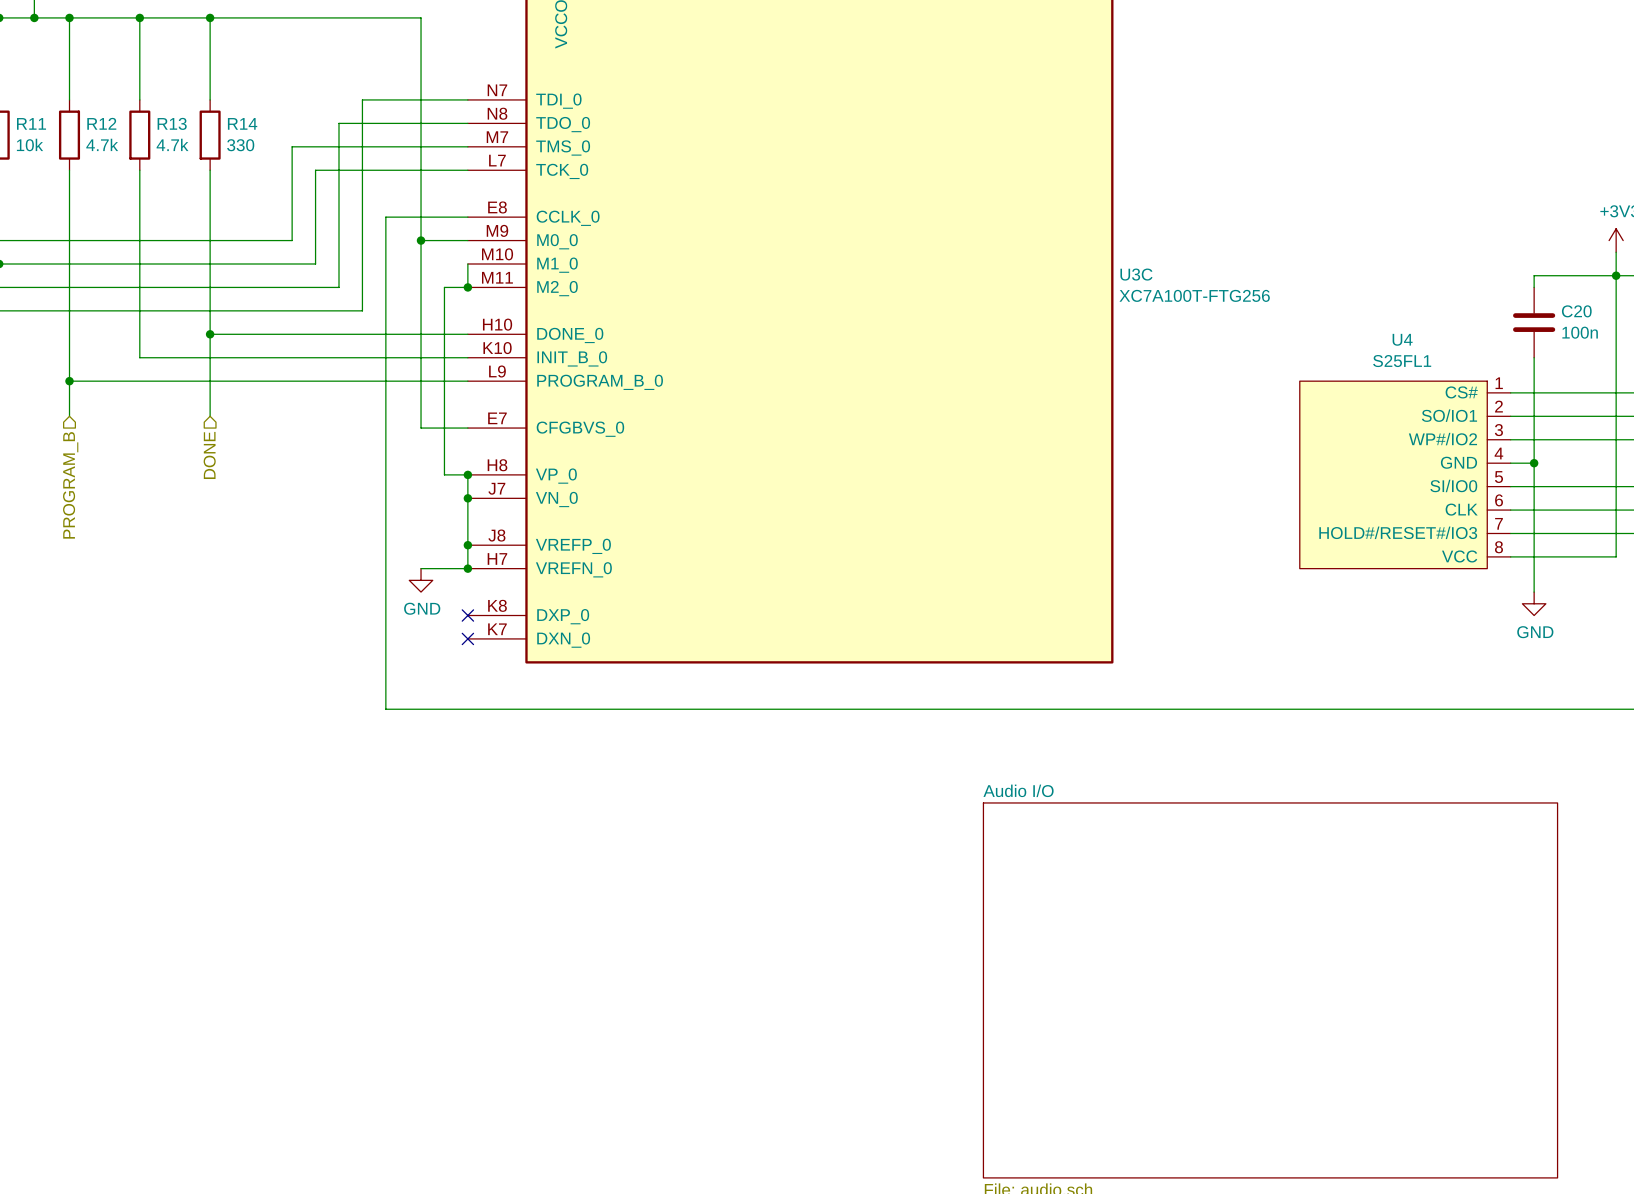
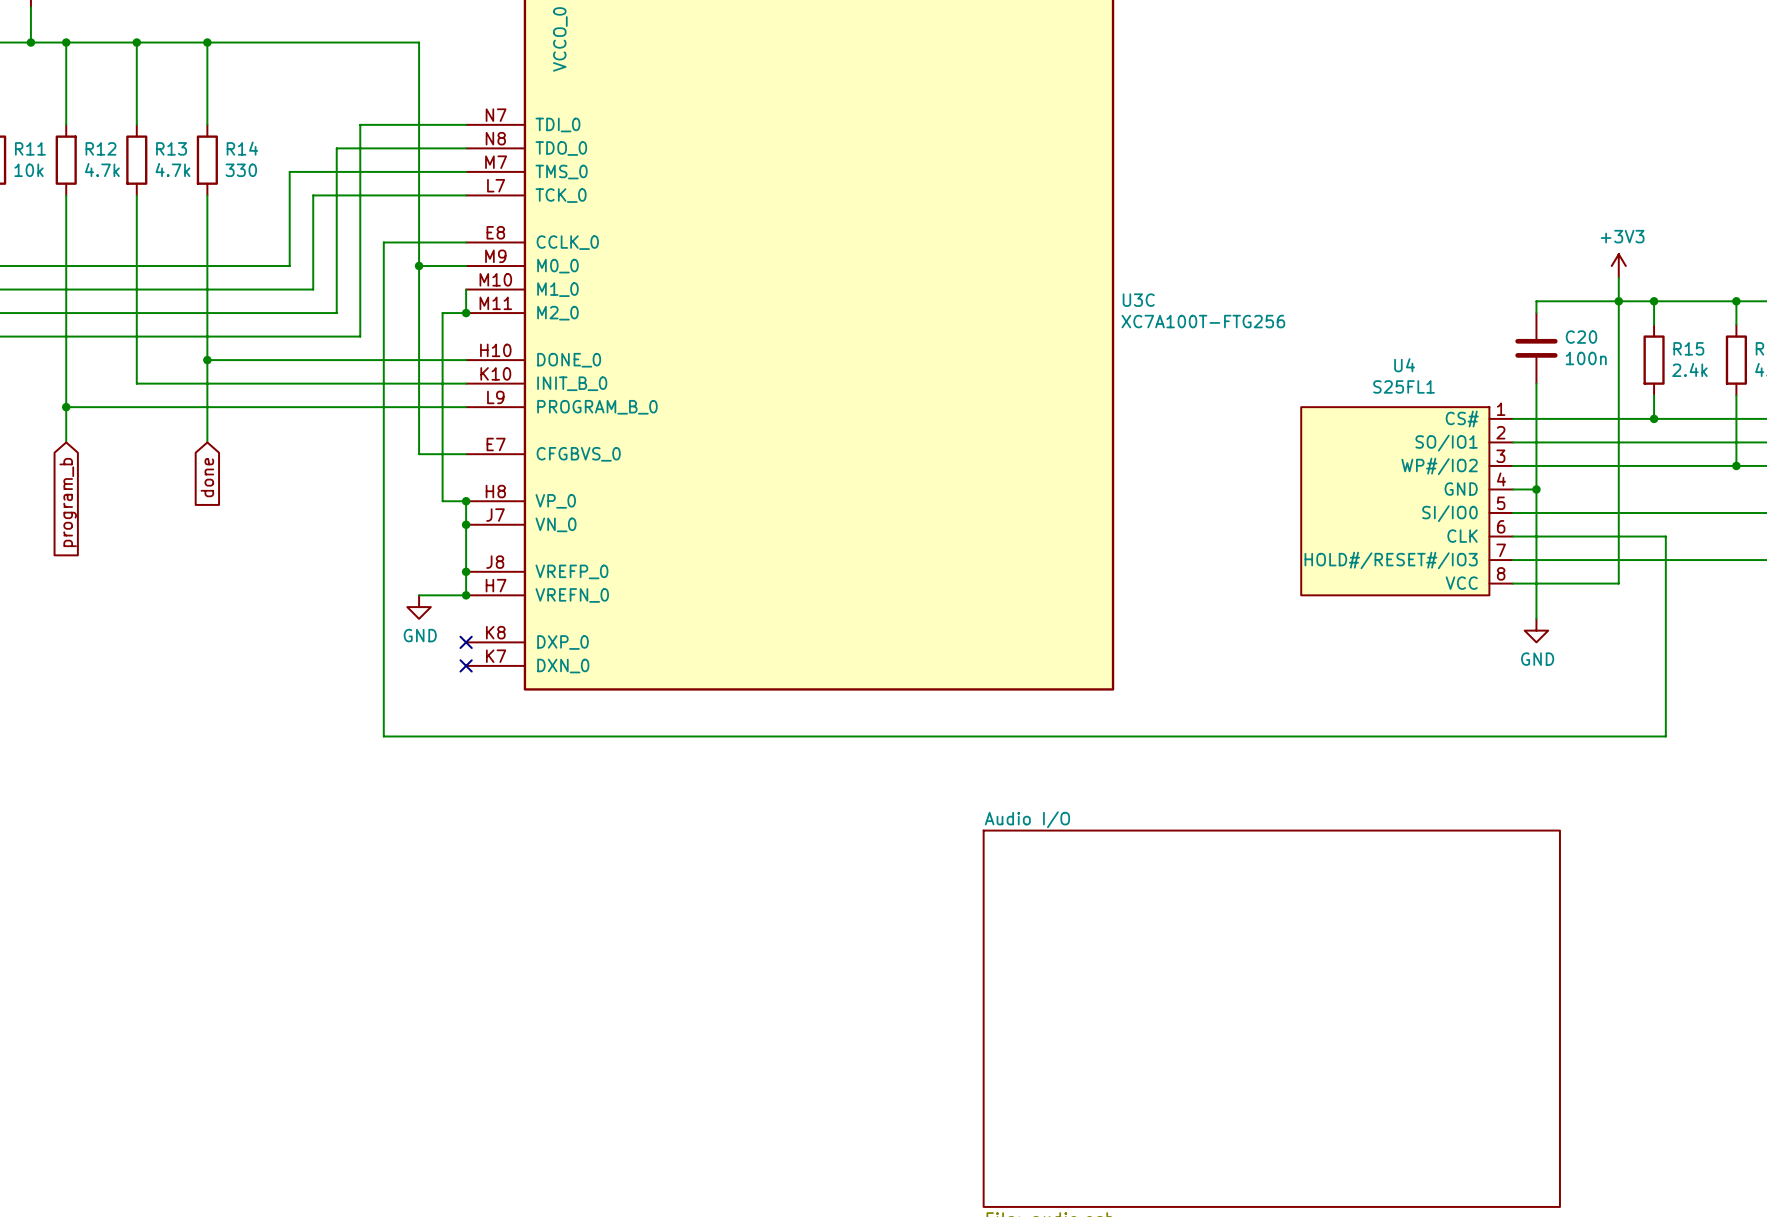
global label: none -> done (207, 477)
hierarchical label: DONE (209, 455) -> none
global label: none -> program_b (68, 502)
hierarchical label: PROGRAM_B (70, 485) -> none

